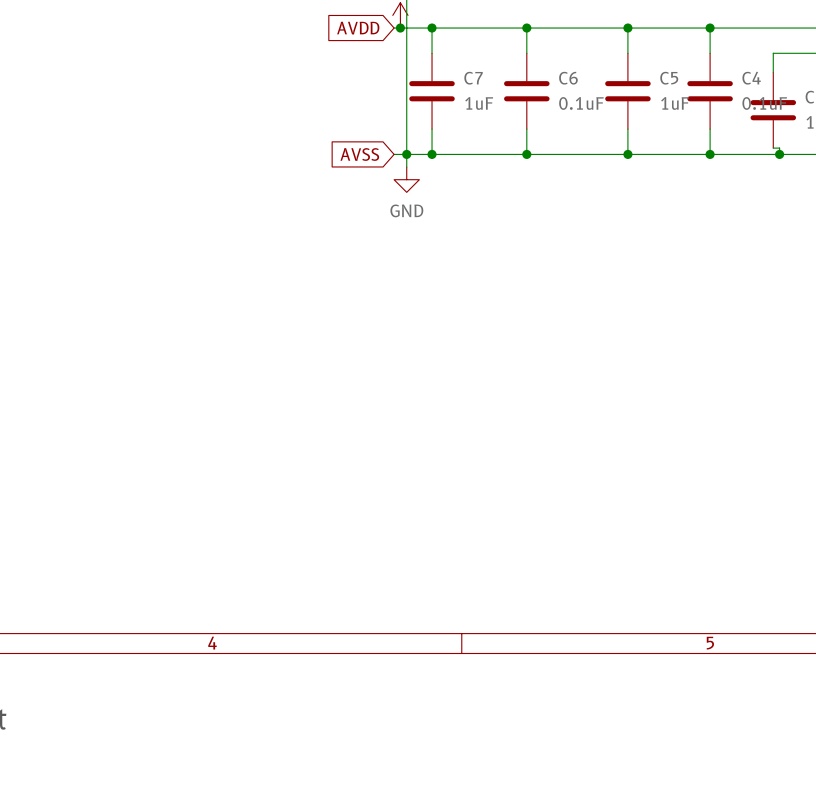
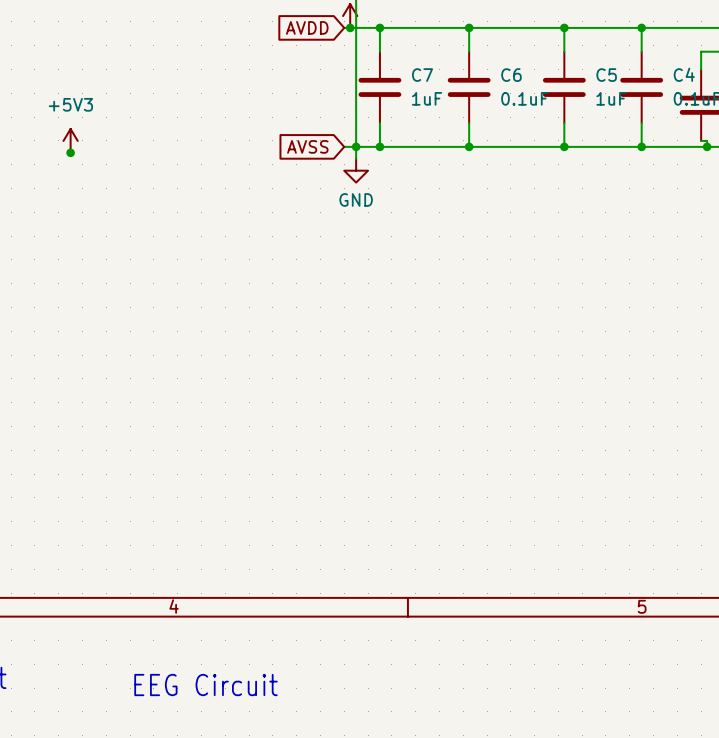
power symbol: none -> +5V3 (70, 140)
junction: none -> (70, 152)
text: none -> EEG Circuit (205, 685)

